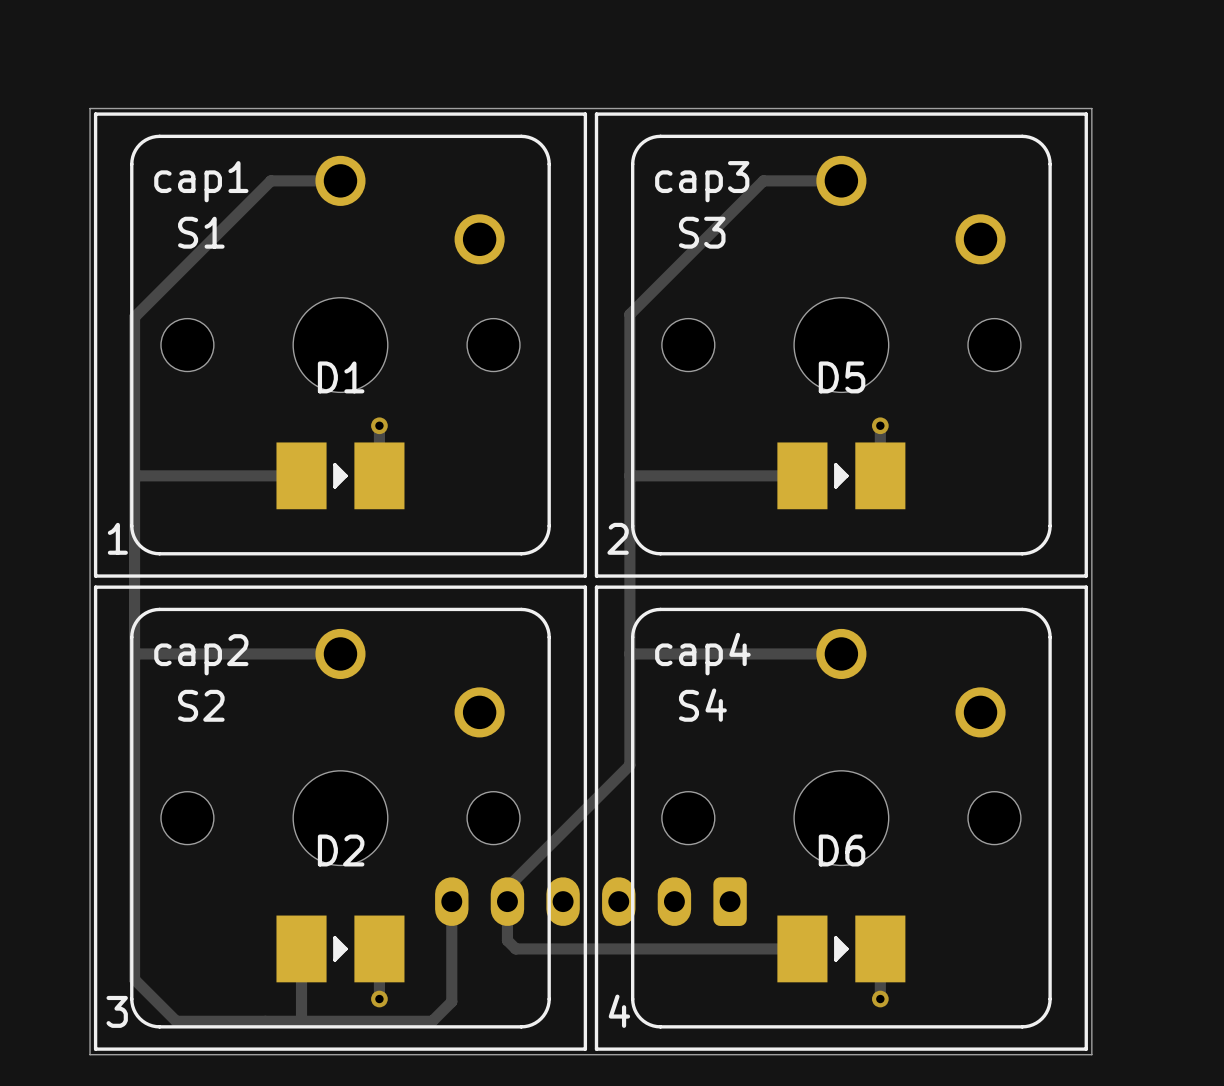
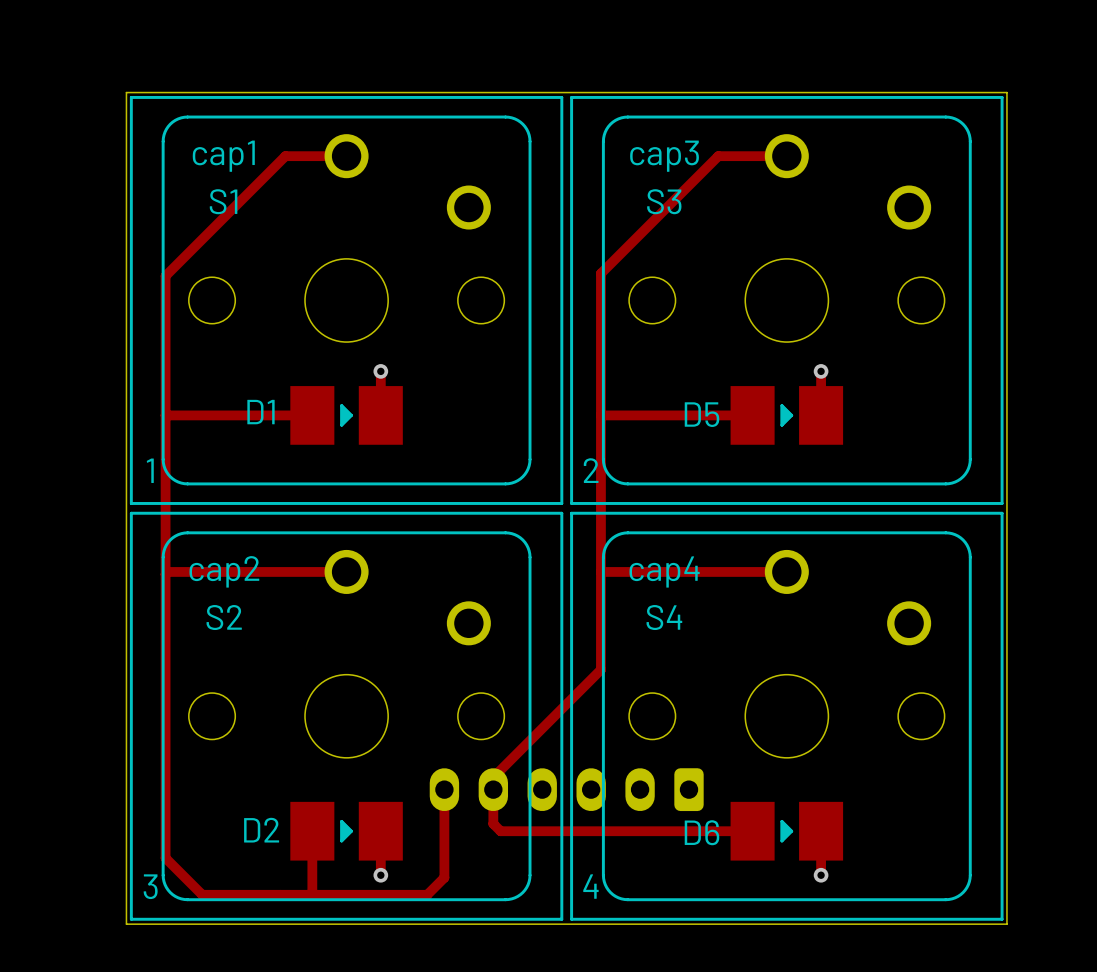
D1 name position: D1 (341, 377) -> D1 (260, 412)
D5 name position: D5 (842, 377) -> D5 (702, 414)
D2 name position: D2 (341, 850) -> D2 (261, 830)
D6 name position: D6 (842, 850) -> D6 (702, 832)

